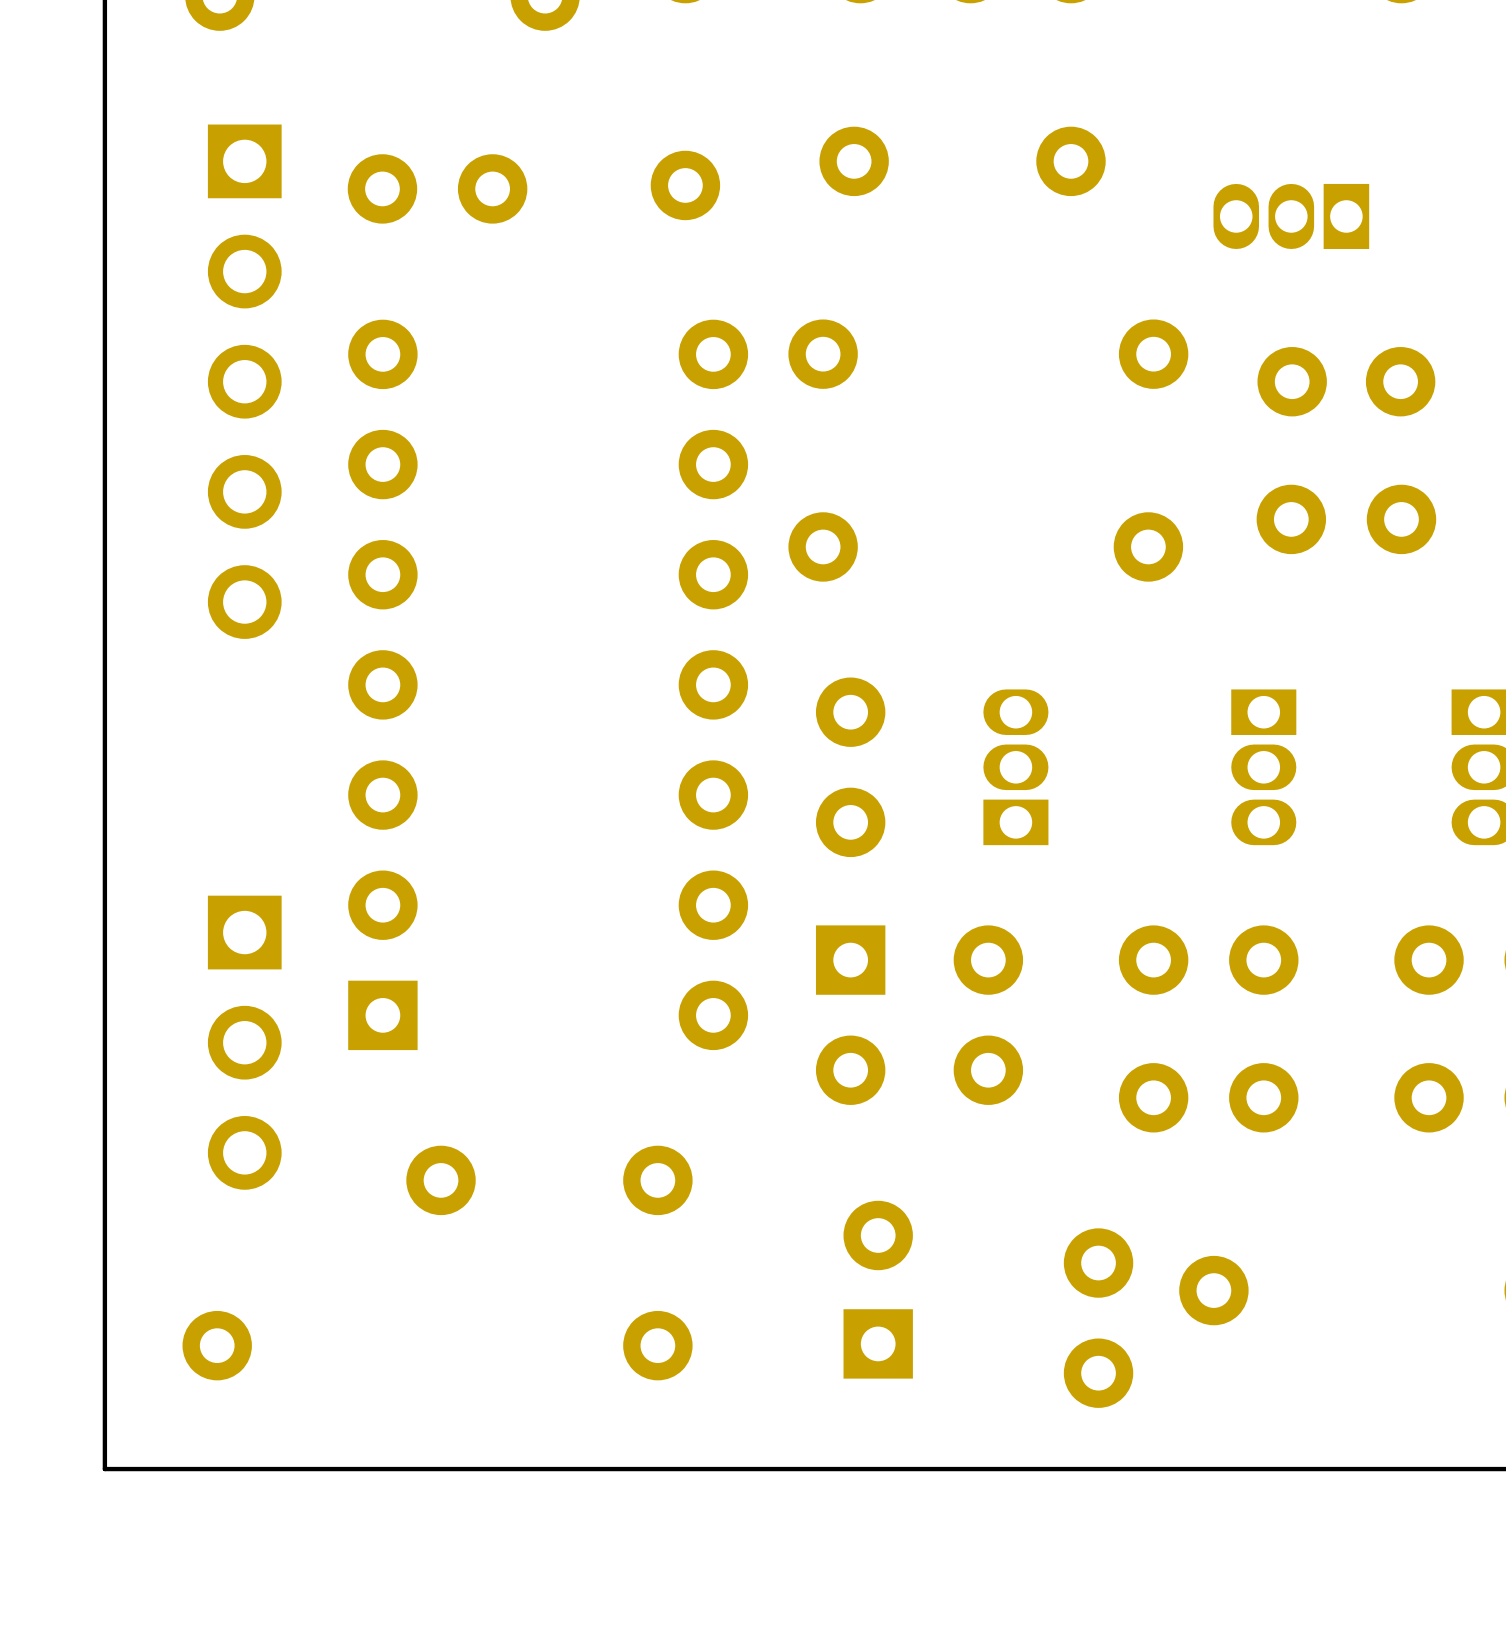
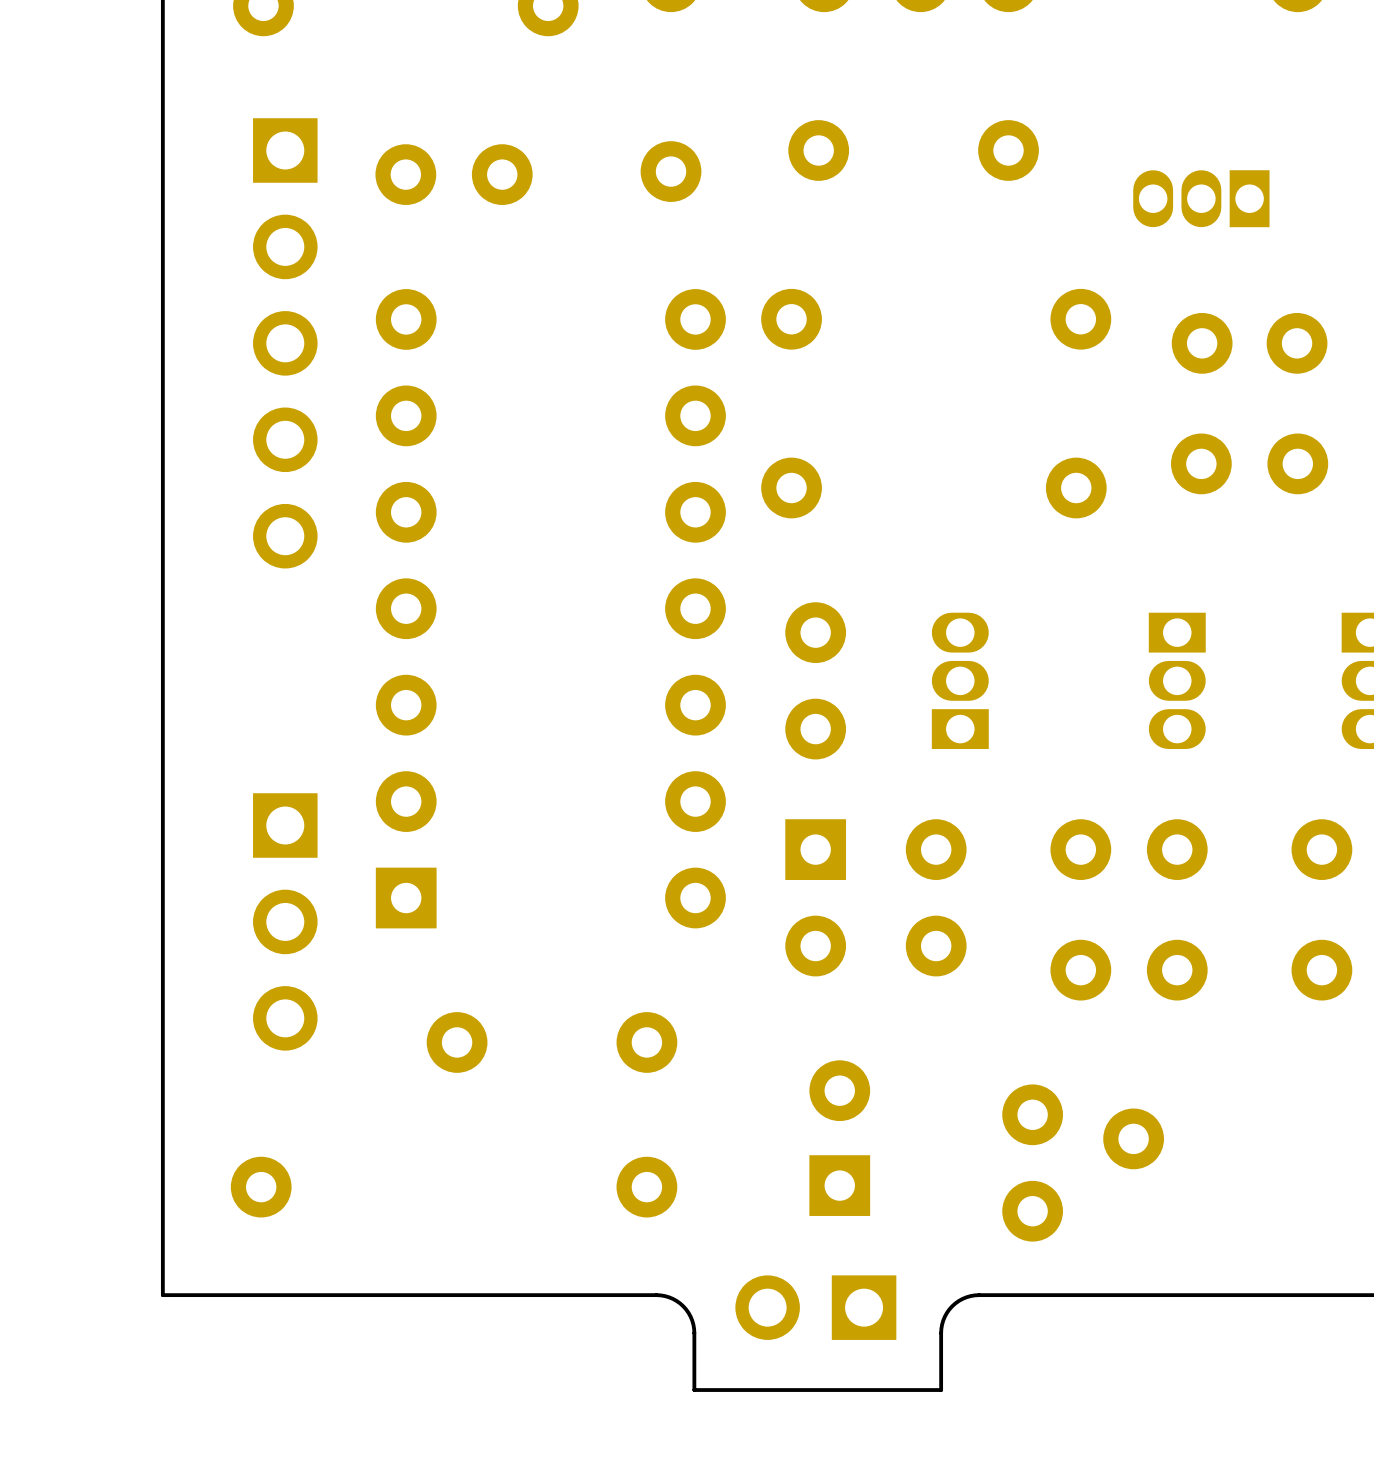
board edge: (1037, 1469) (668, 1469) -> (979, 1295) (958, 1300) (949, 1309) (943, 1320) (941, 1333) (941, 1390) (694, 1390) (694, 1333) (692, 1320) (686, 1309) (676, 1300) (656, 1295)
part: none -> (815, 1307)

